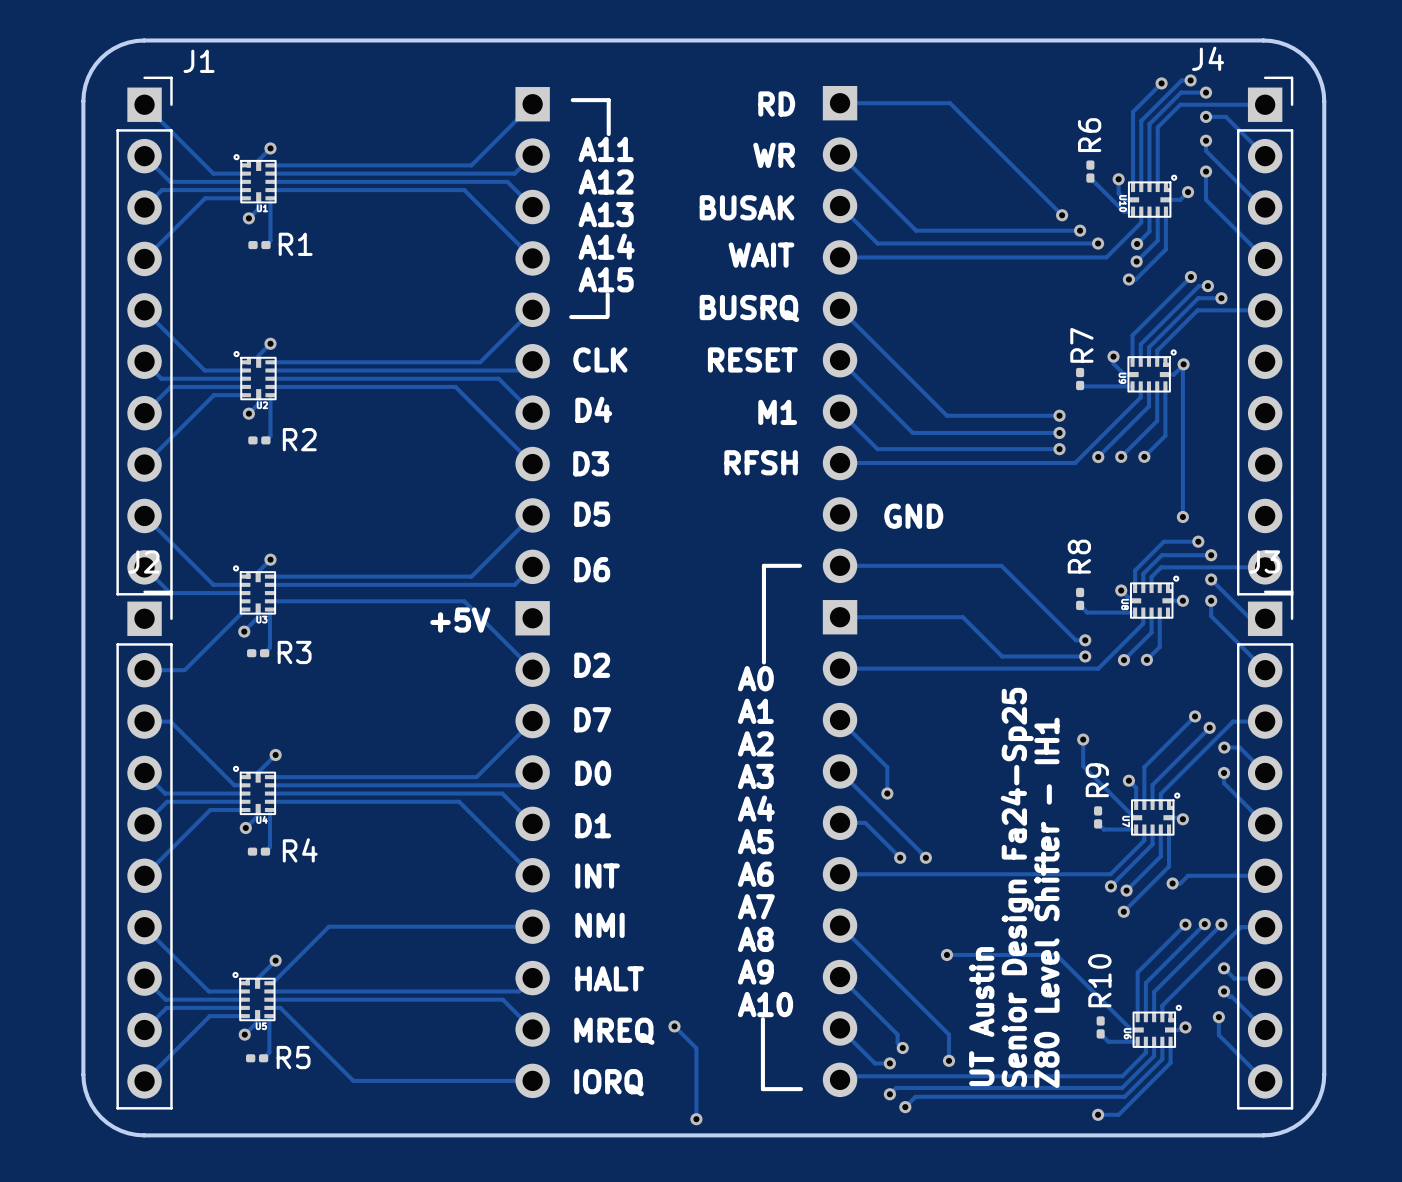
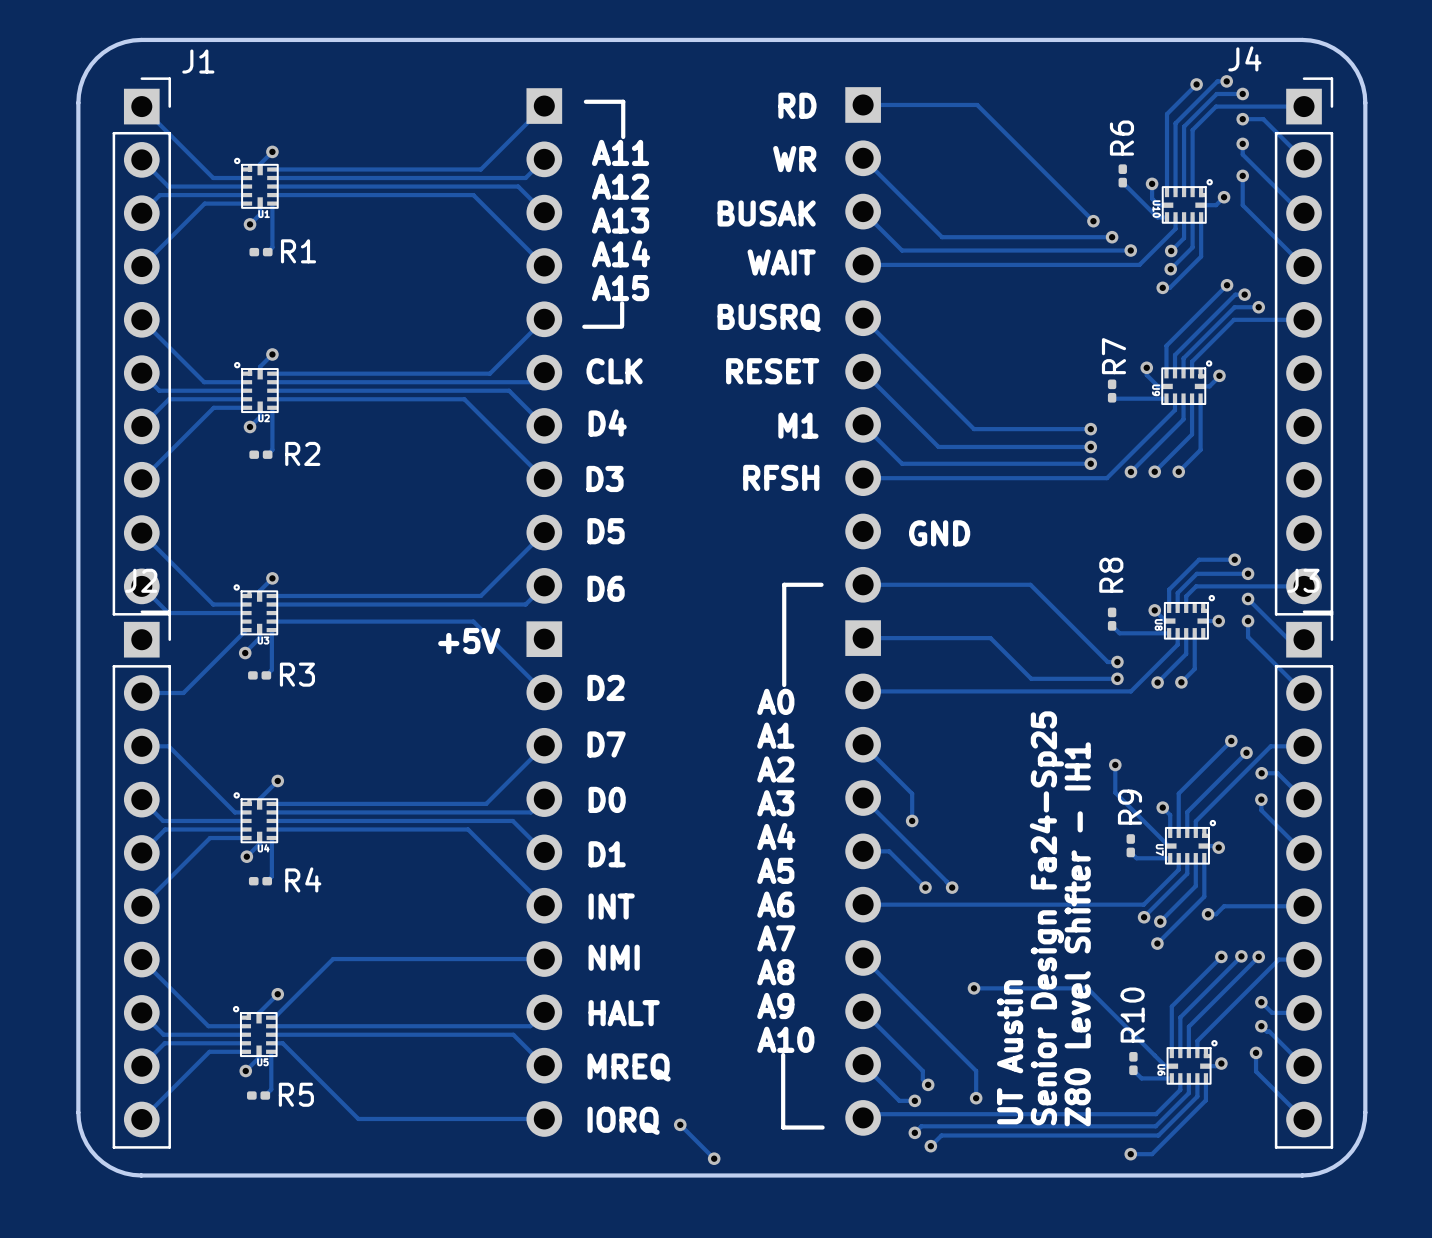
track: (1183, 364) (1182, 517) -> none
via: (1182, 517) -> none
track: (674, 1026) (696, 1048) (696, 1119) -> (680, 1124) (714, 1158)
via position: (674, 1026) -> (680, 1124)

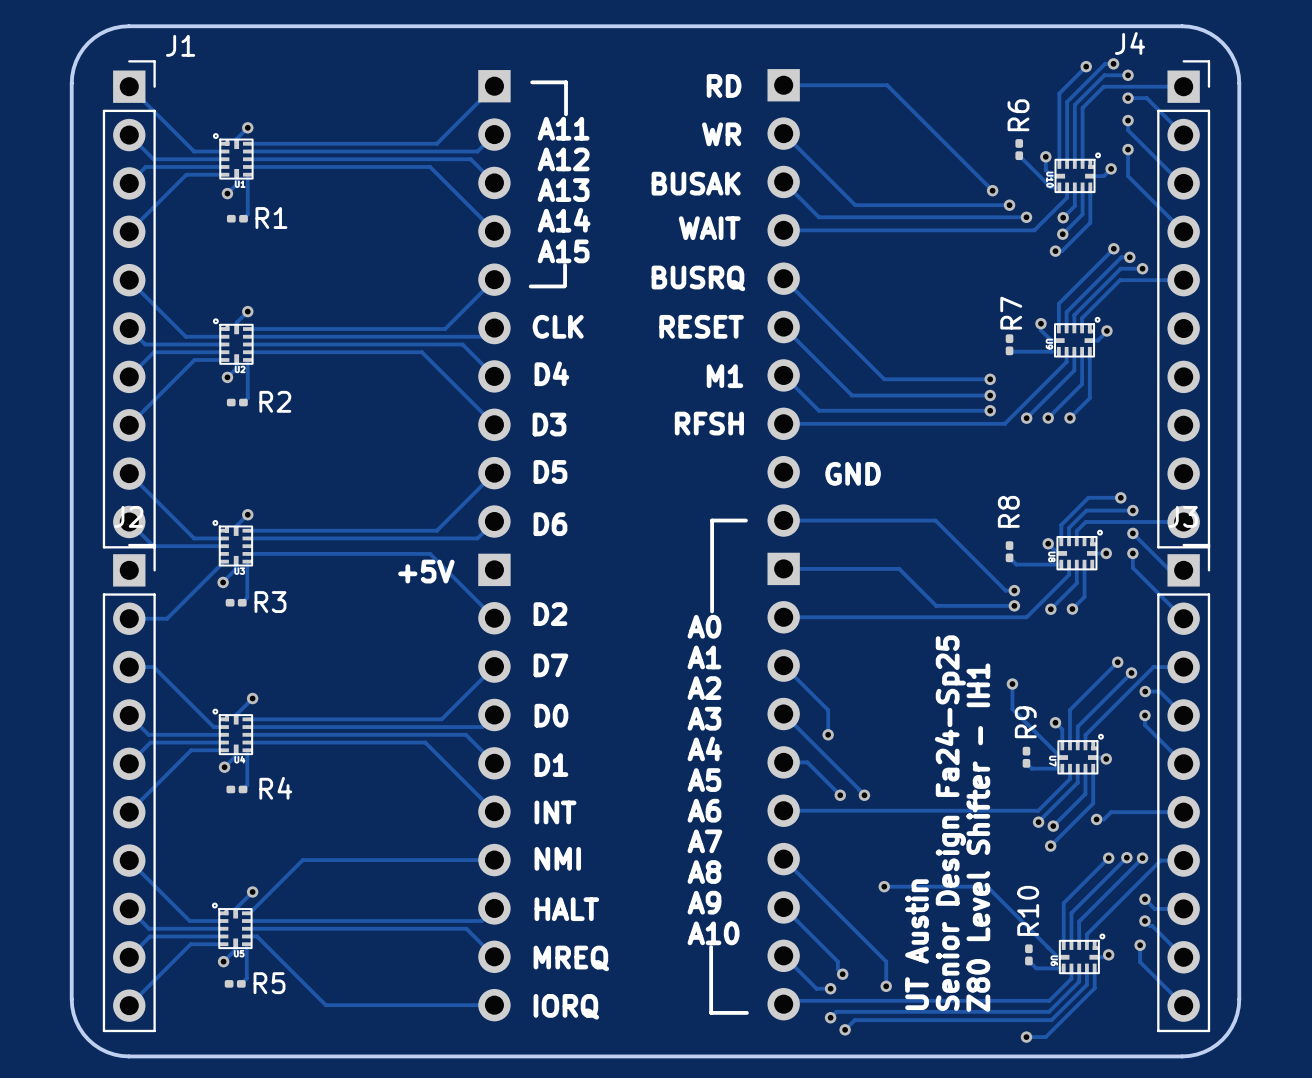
track: (680, 1124) (714, 1158) -> none
via: (680, 1124) -> none
via: (714, 1158) -> none

